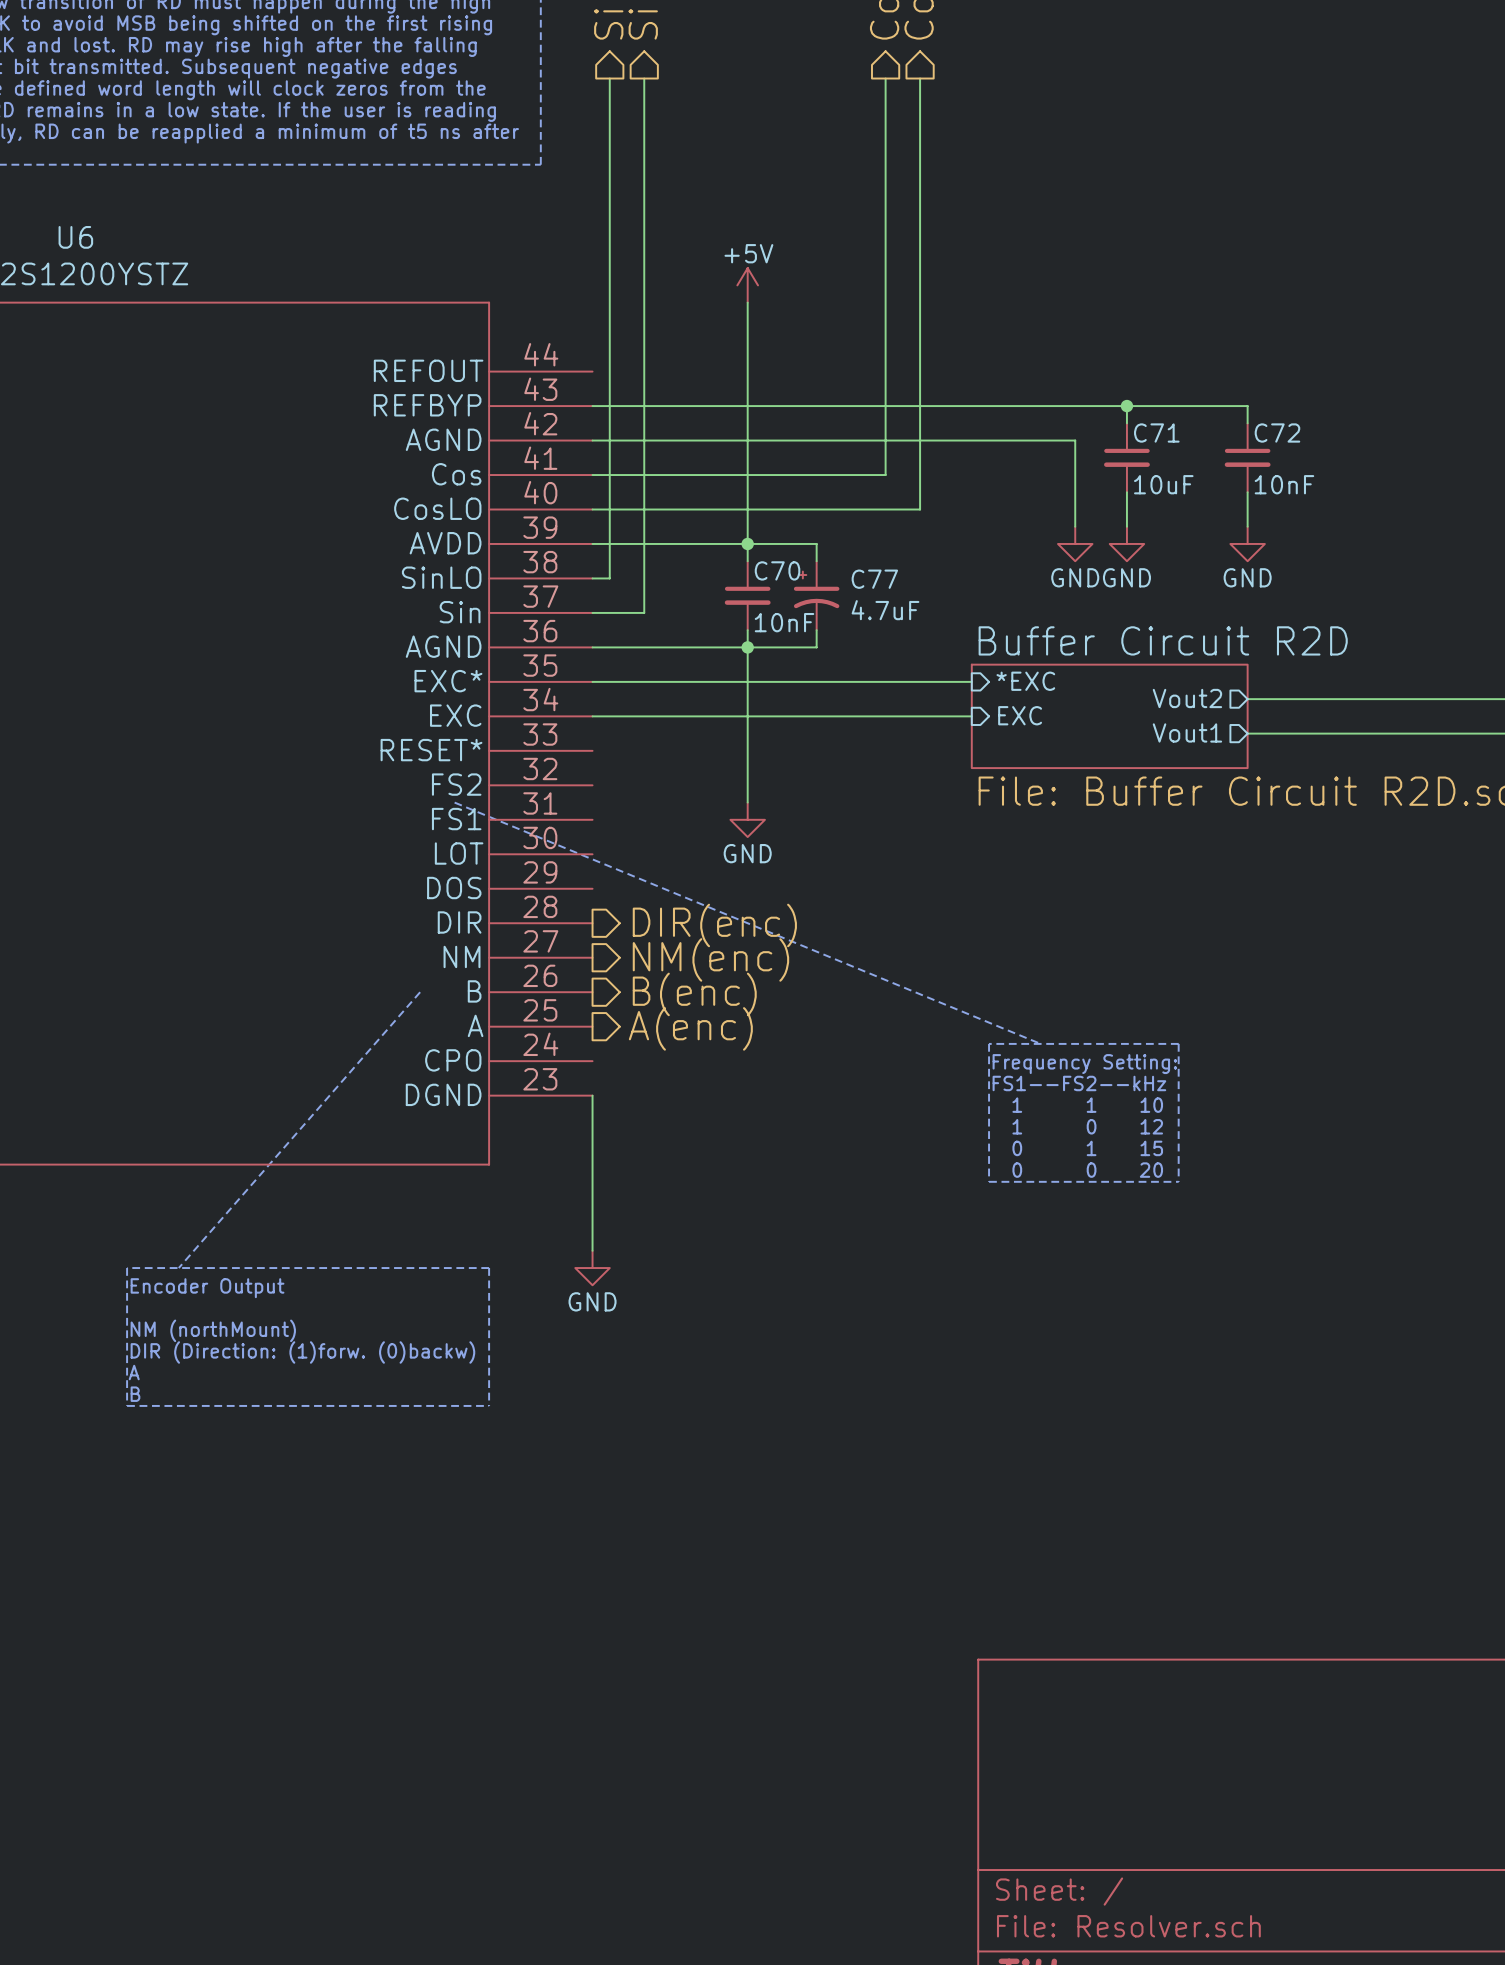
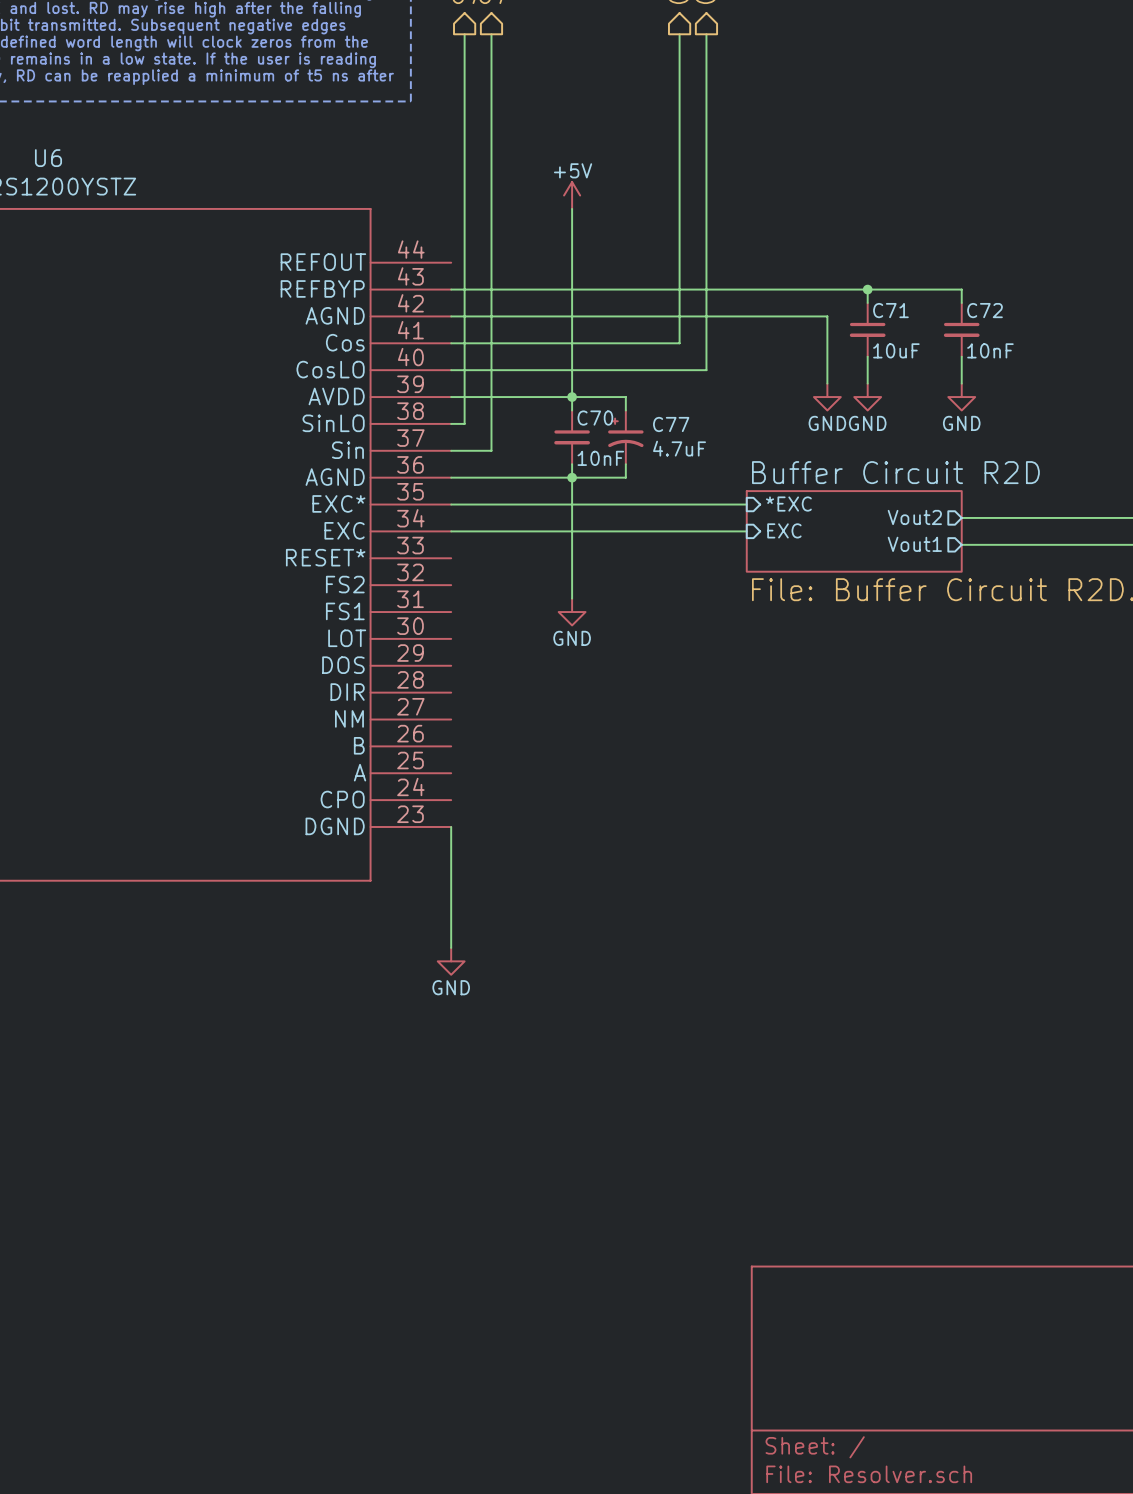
line: (454, 802) (1040, 1043) -> none
hierarchical label: DIR(enc) (714, 925) -> none
hierarchical label: NM(enc) (710, 959) -> none
line: (420, 992) (178, 1268) -> none
hierarchical label: B(enc) (694, 994) -> none
hierarchical label: A(enc) (690, 1028) -> none
line: (989, 1043) (1178, 1043) (1178, 1181) (989, 1181) (989, 1043) -> none
text: Frequency Setting: (1084, 1064) -> none
text: FS1--FS2--kHz (1079, 1083) -> none
text: 1 1 10 (1087, 1105) -> none
text: 1 0 12 (1087, 1126) -> none
text: 0 1 15 (1087, 1148) -> none
text: 0 0 20 (1087, 1170) -> none
line: (127, 1268) (489, 1268) (489, 1405) (127, 1405) (127, 1268) -> none
text: Encoder Output (207, 1288) -> none
text: NM (northMount) (213, 1330) -> none
text: DIR (Direction: (1)forw. (0)backw) (302, 1352) -> none
text: A (134, 1372) -> none
text: B (135, 1394) -> none

